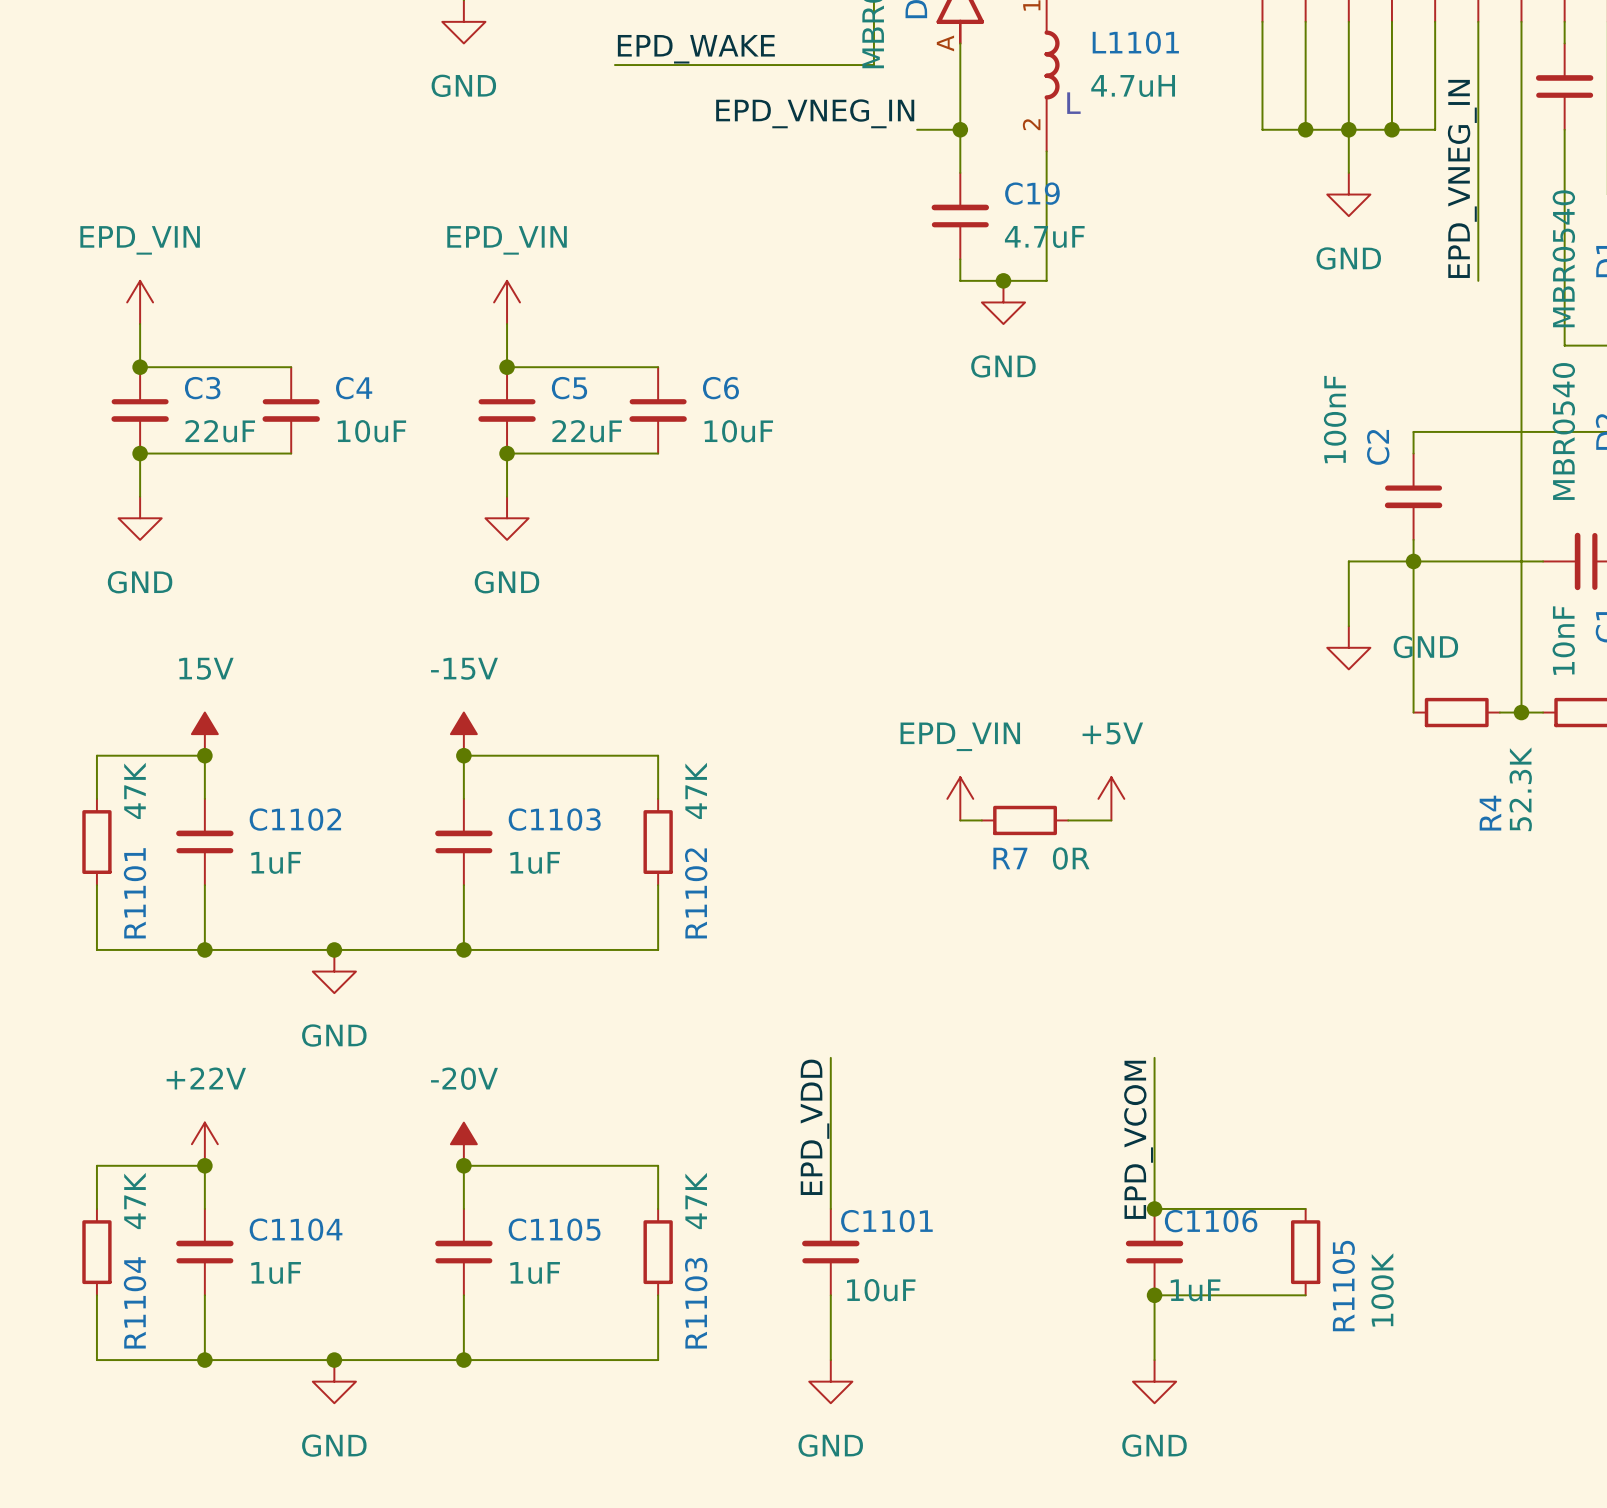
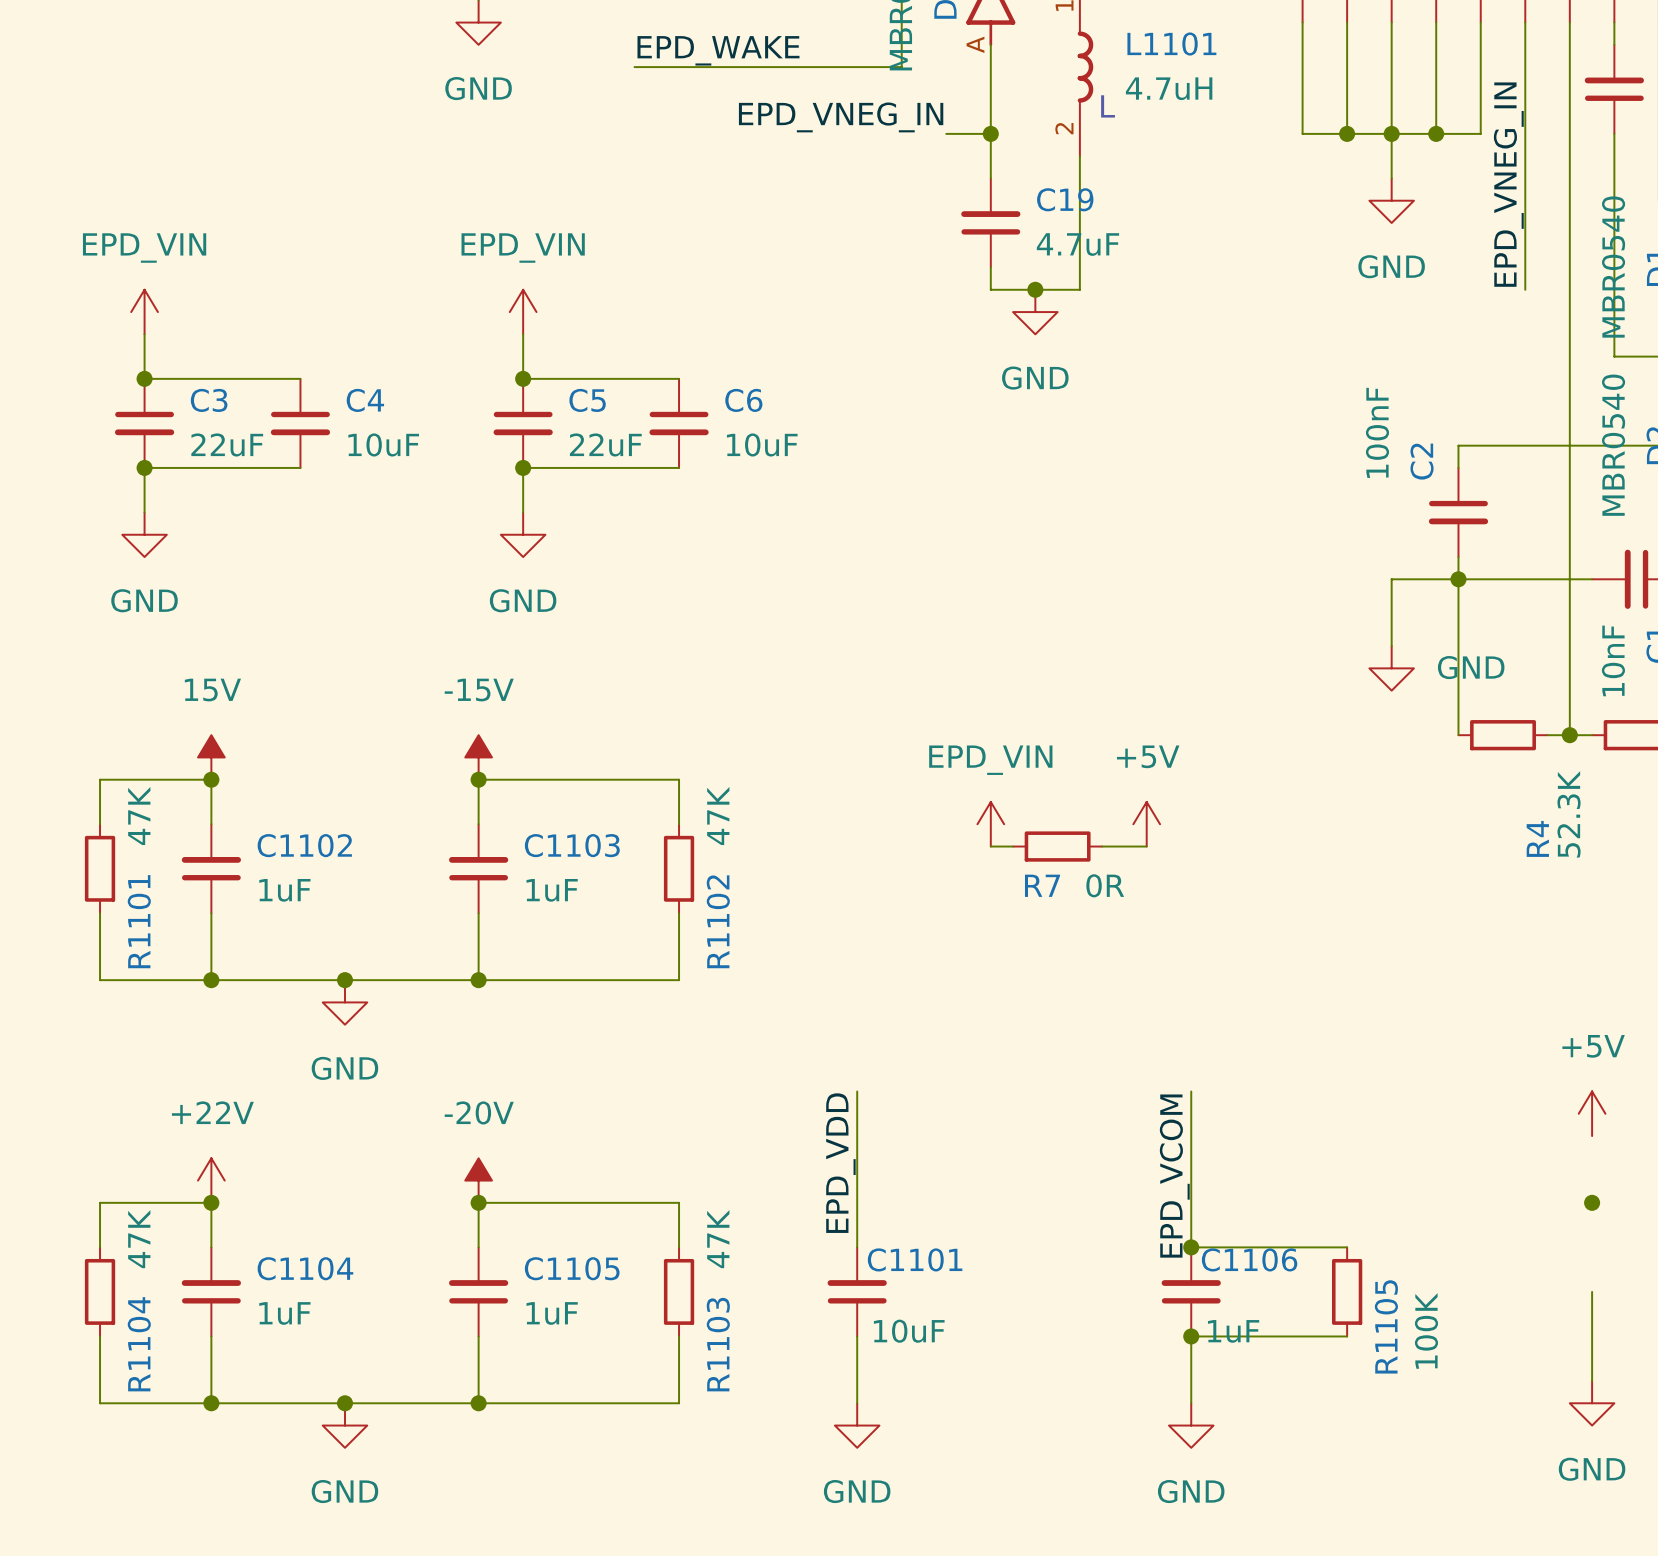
power symbol: none -> +5V (1592, 1113)
junction: none -> (1592, 1202)
wire: none -> (1592, 1291) (1592, 1381)
power symbol: none -> GND (1592, 1403)

